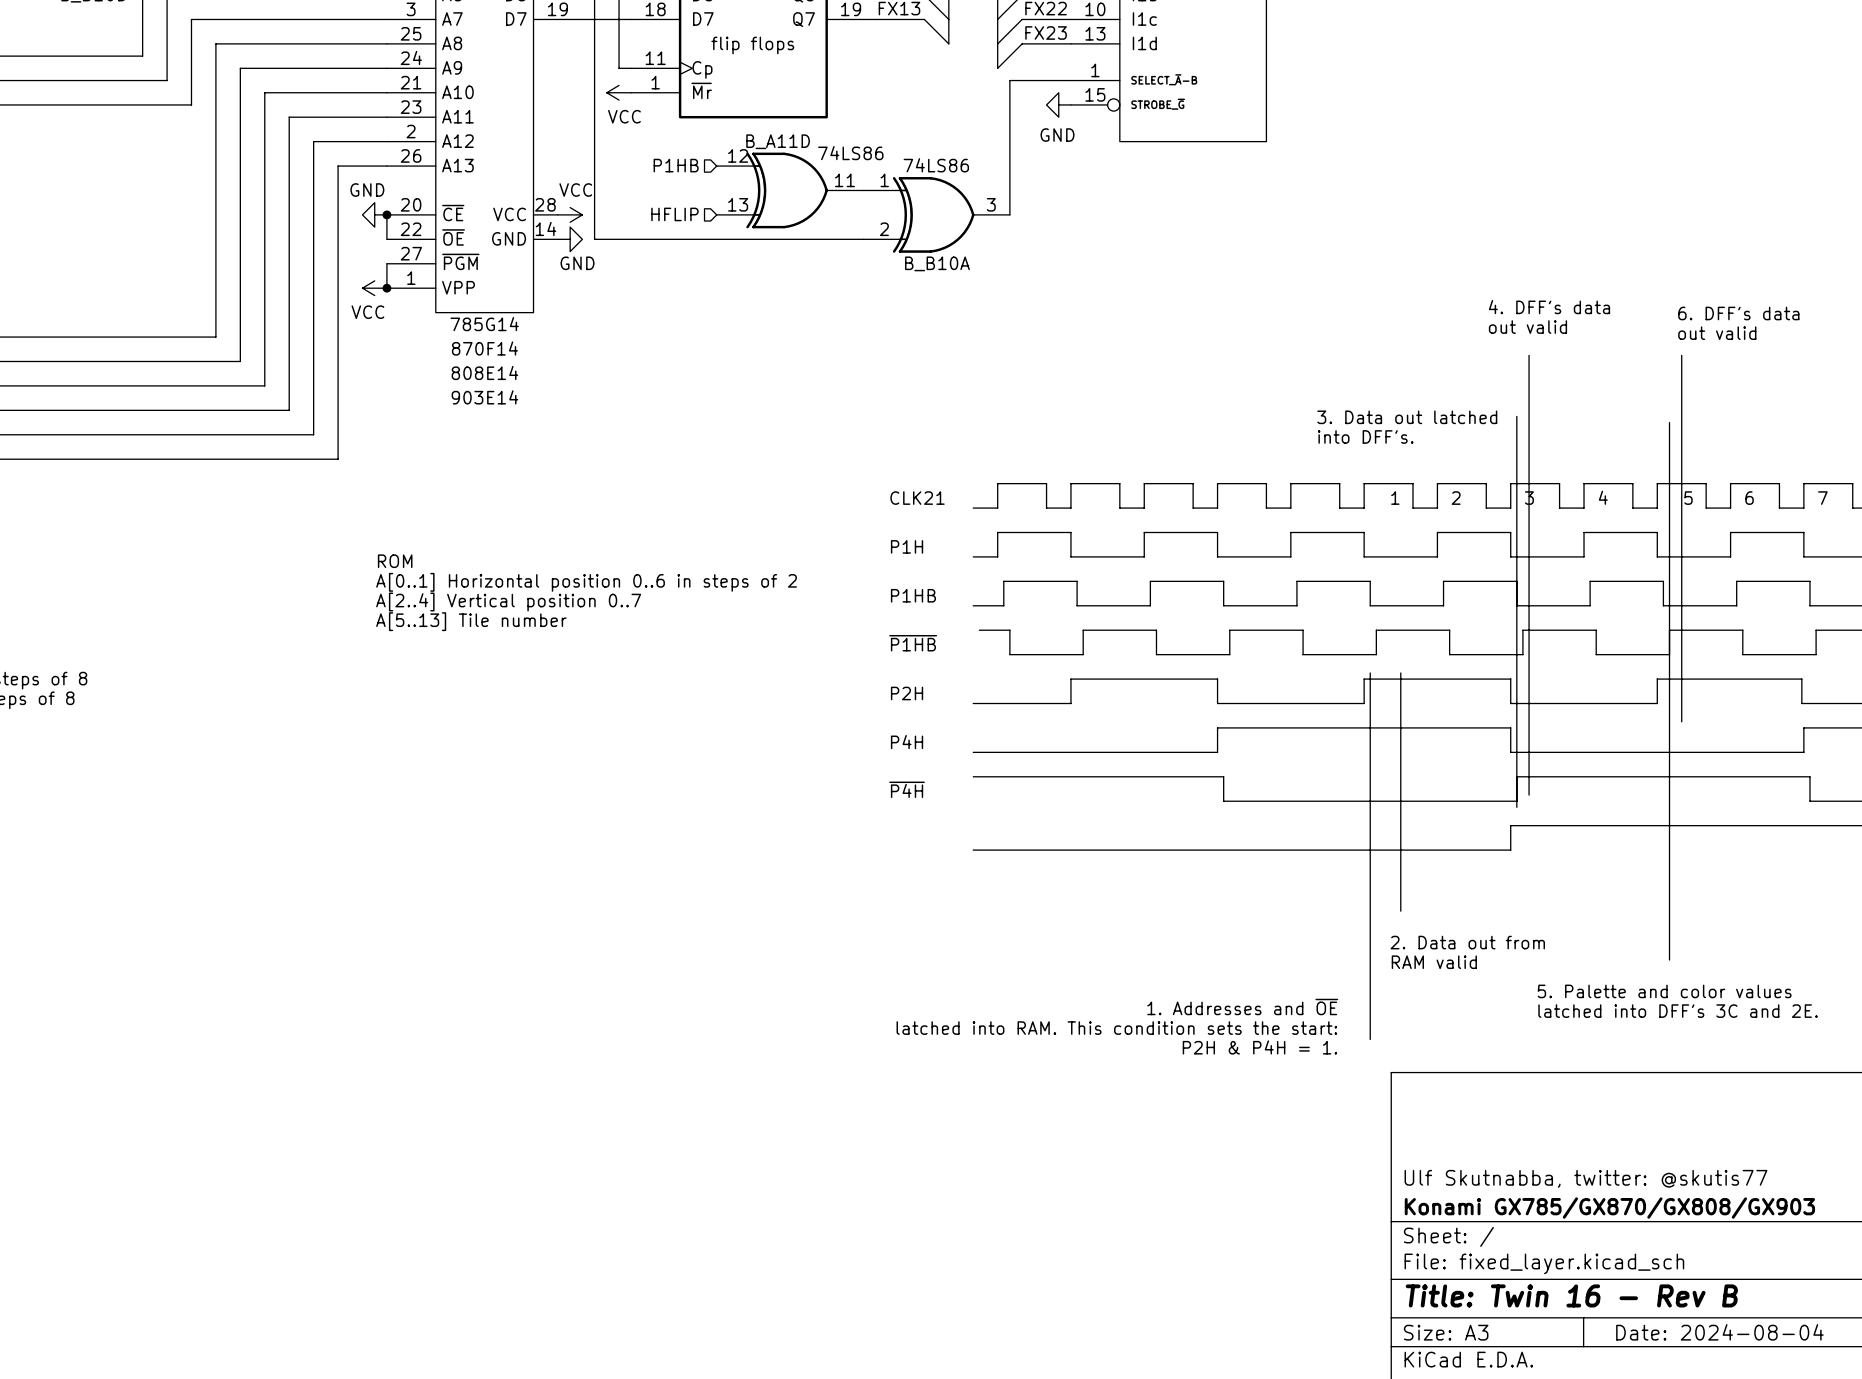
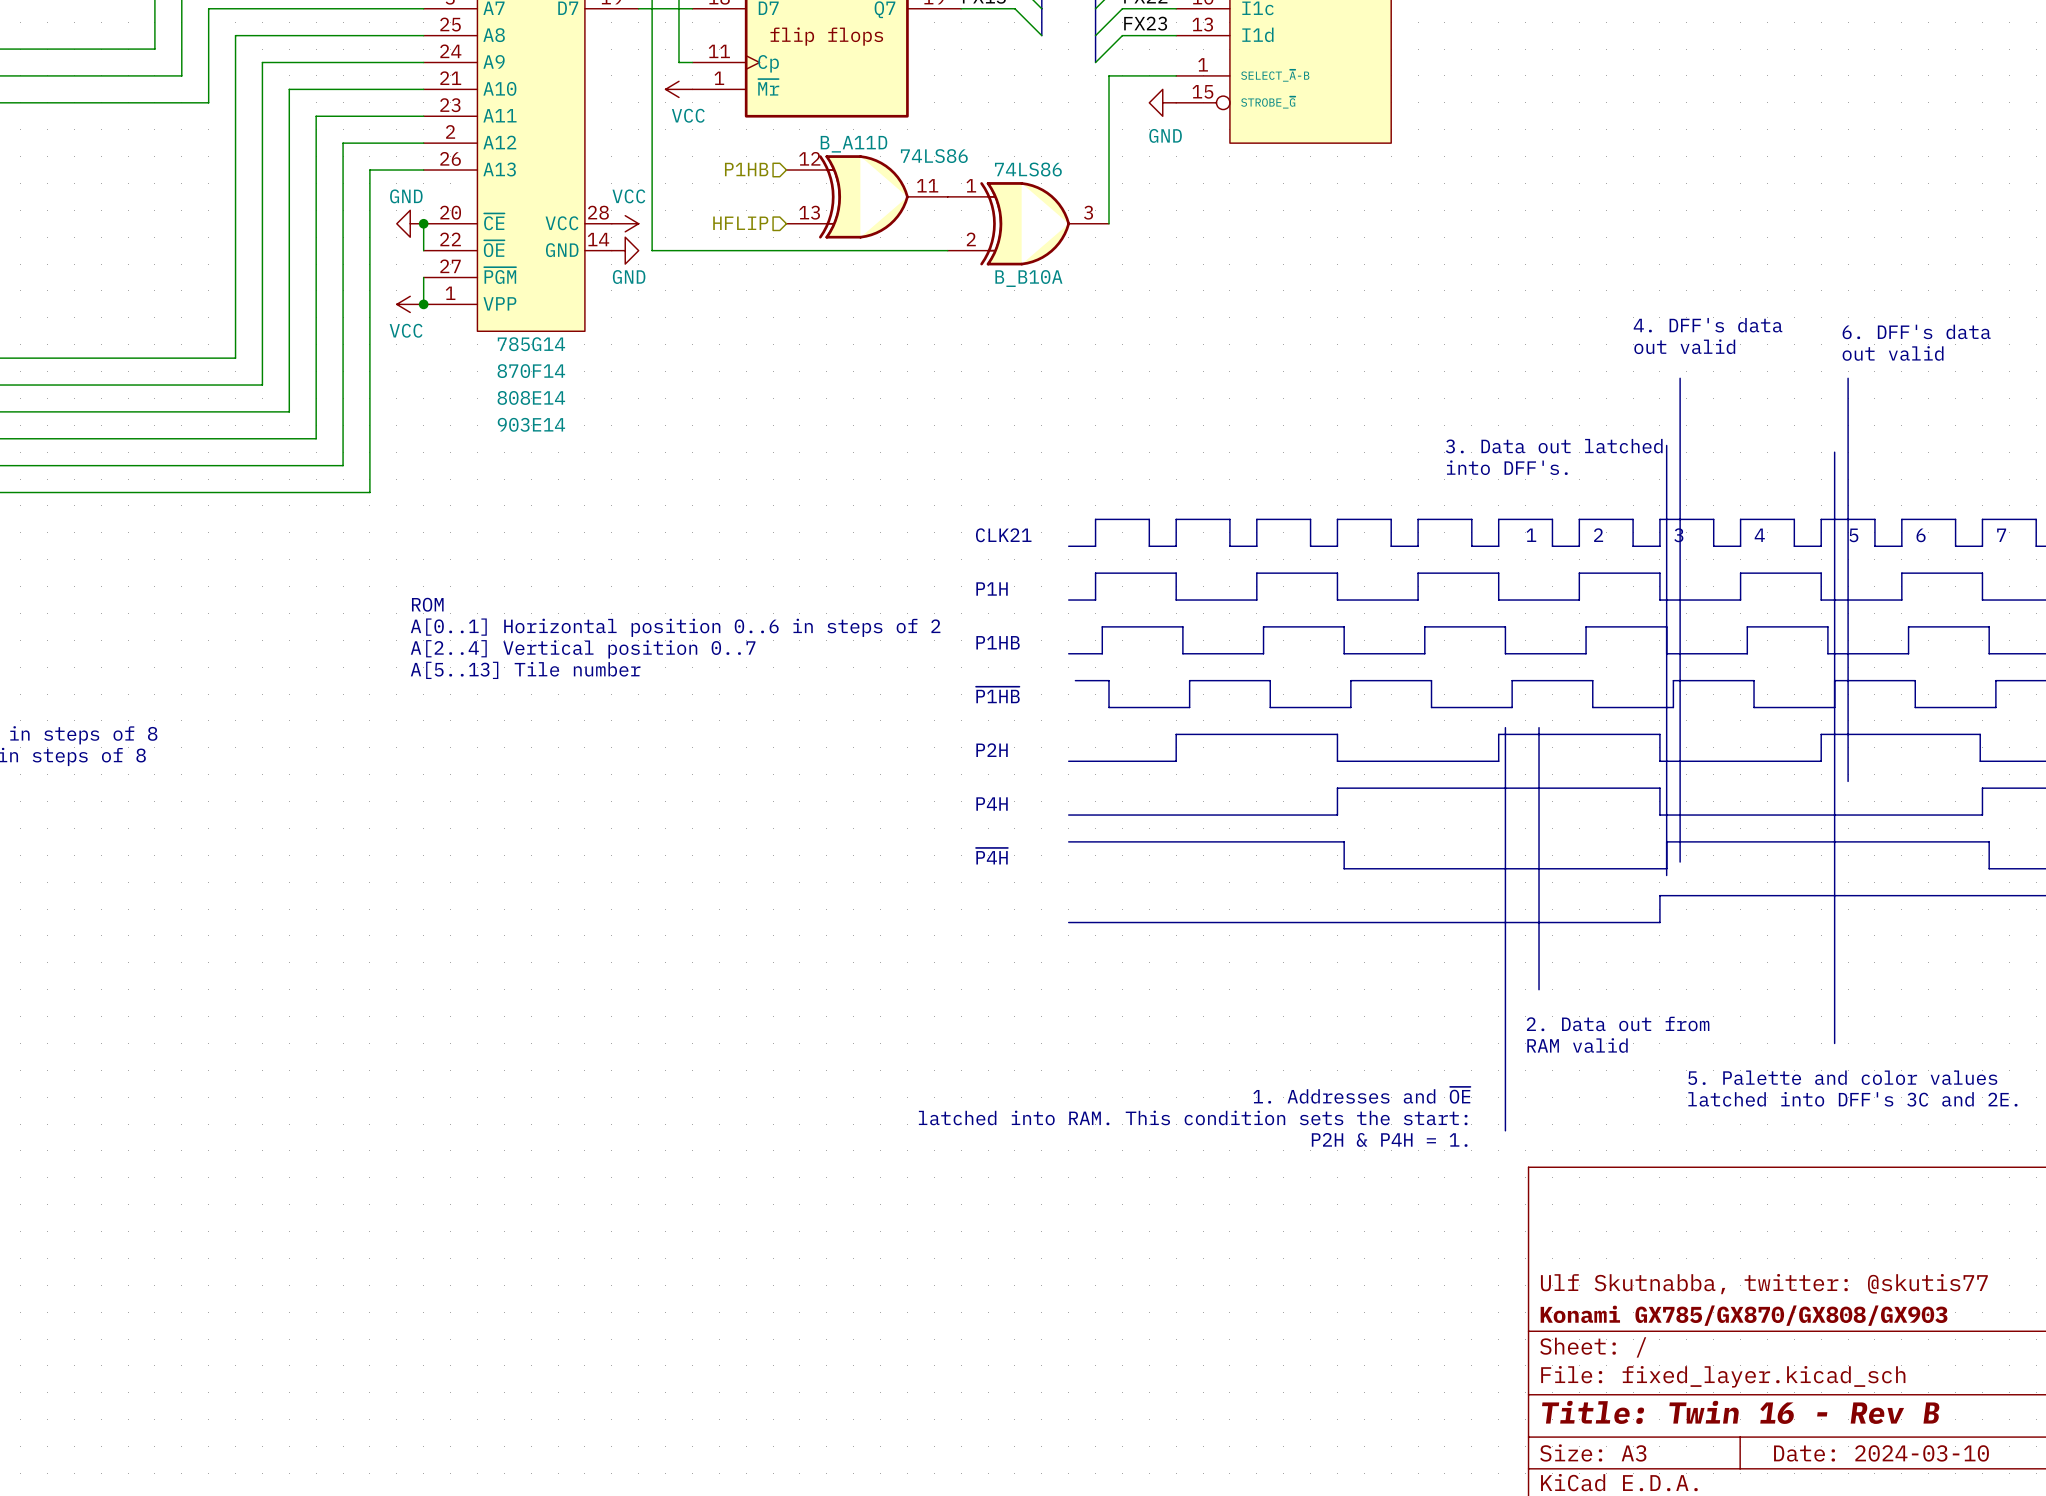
title block: Date: 2024-08-04 (1719, 1332) -> Date: 2024-03-10 (1881, 1453)

